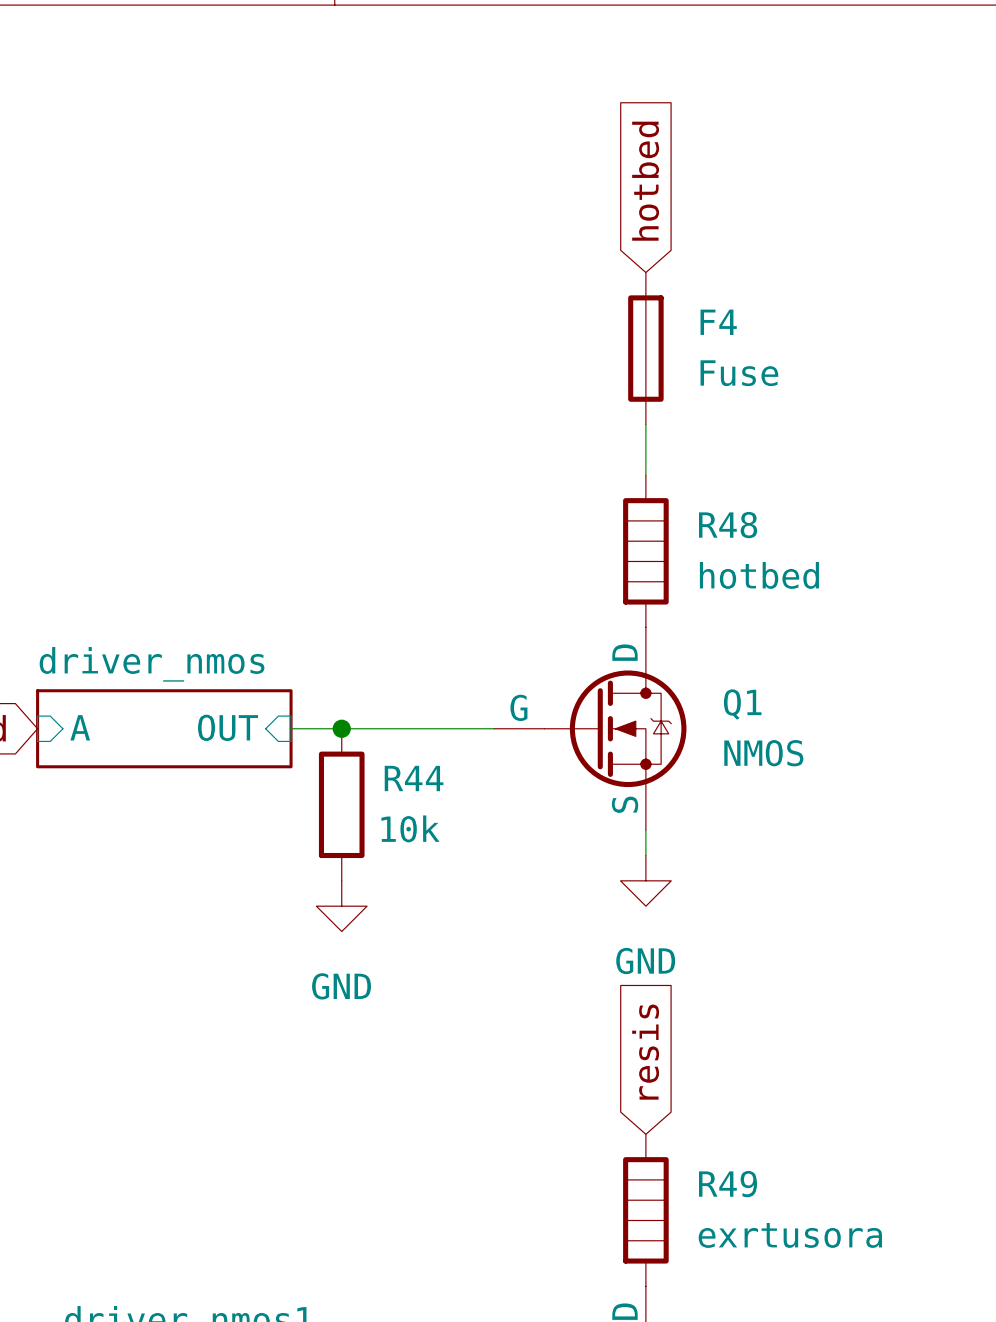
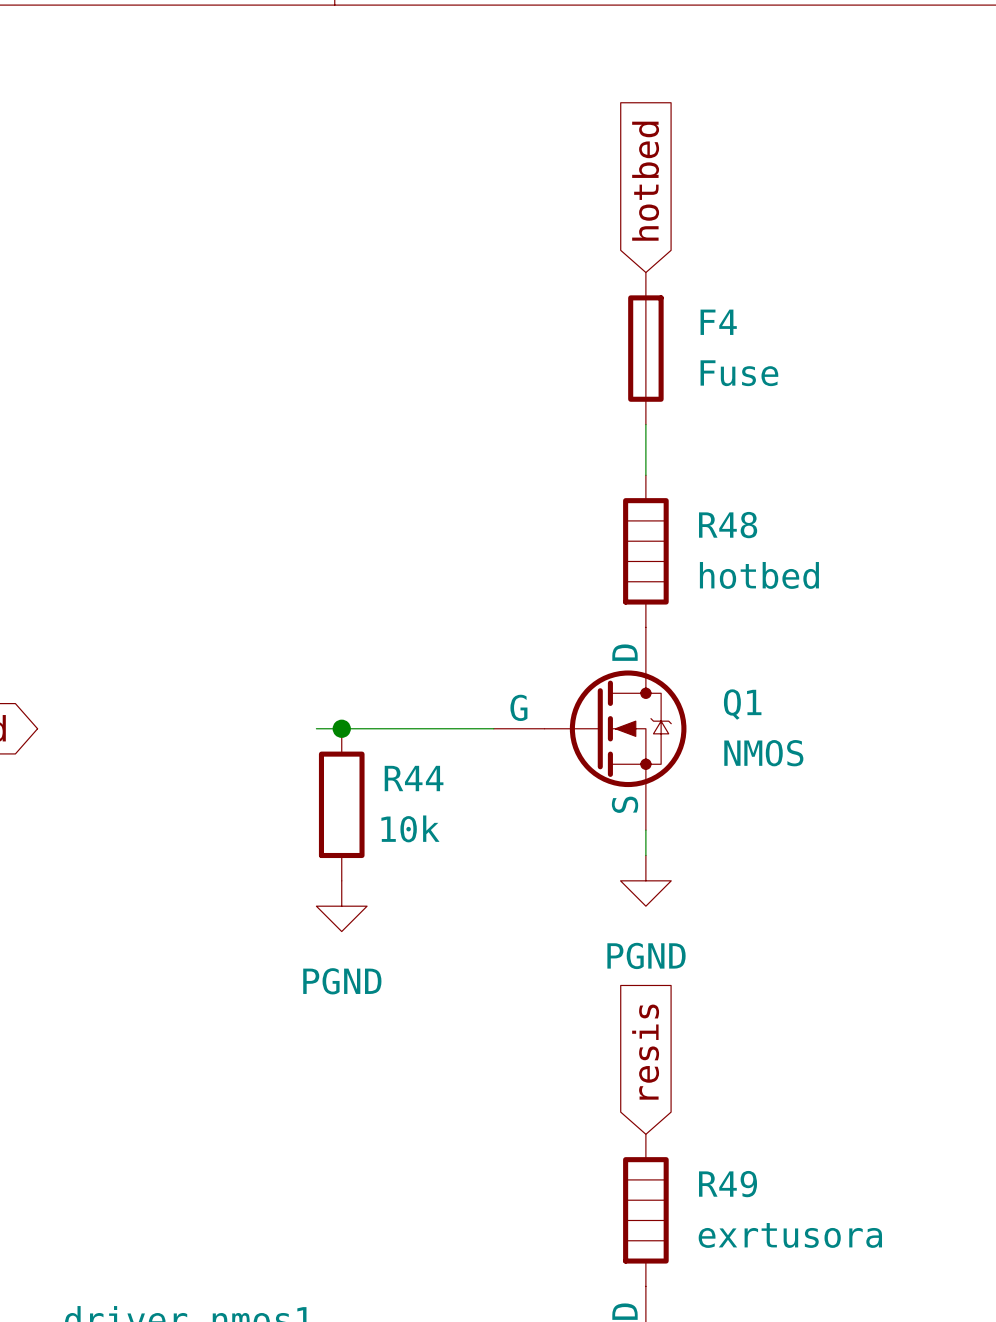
sheet pin: A (80, 727) -> none
sheet pin: OUT (228, 727) -> none
sheet driver_nmos: (164, 728) -> none
wire: (291, 728) (316, 728) -> none
power symbol: GND (645, 880) -> PGND (645, 880)
power symbol: GND (341, 906) -> PGND (341, 906)

